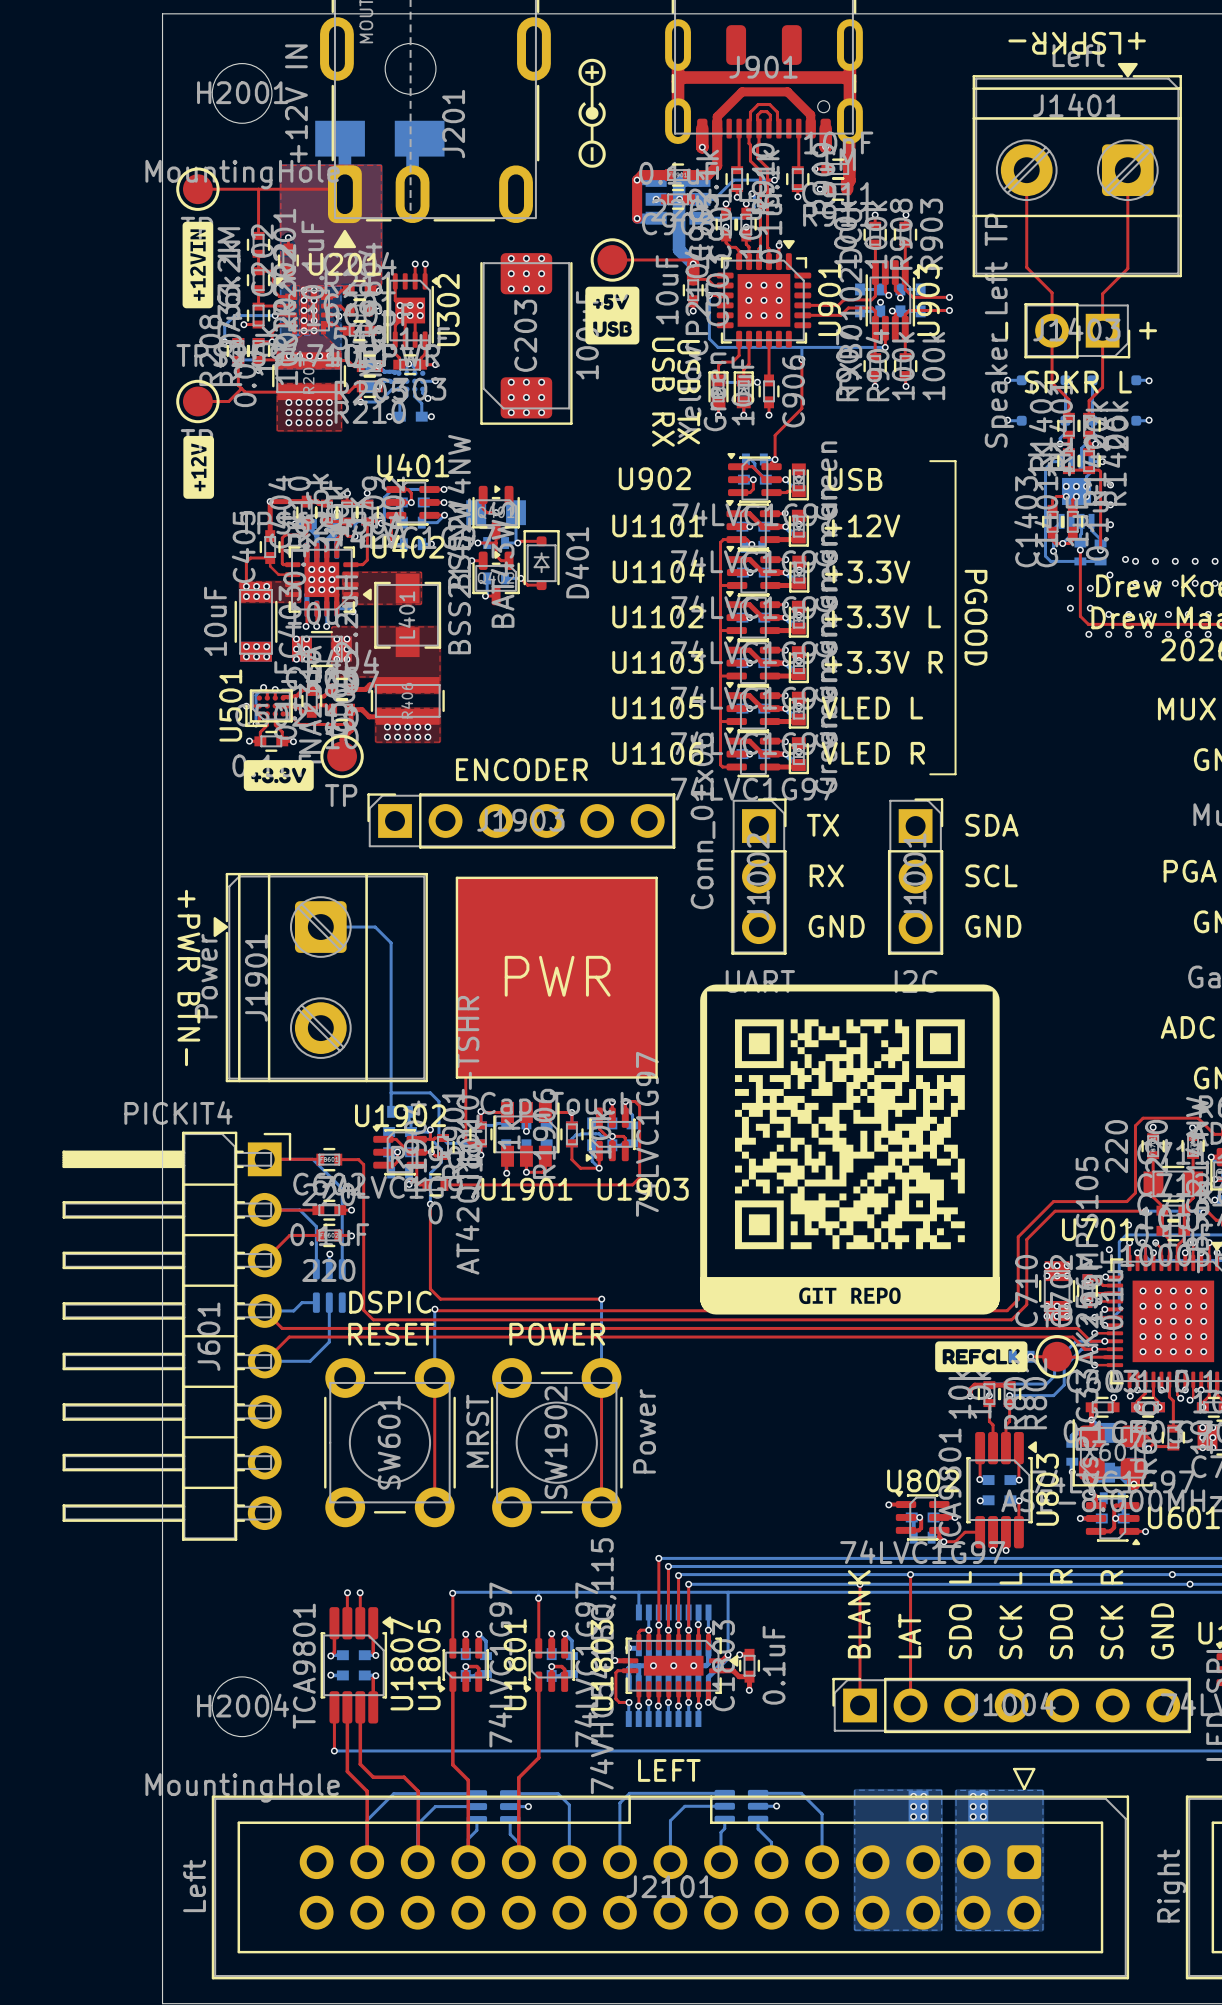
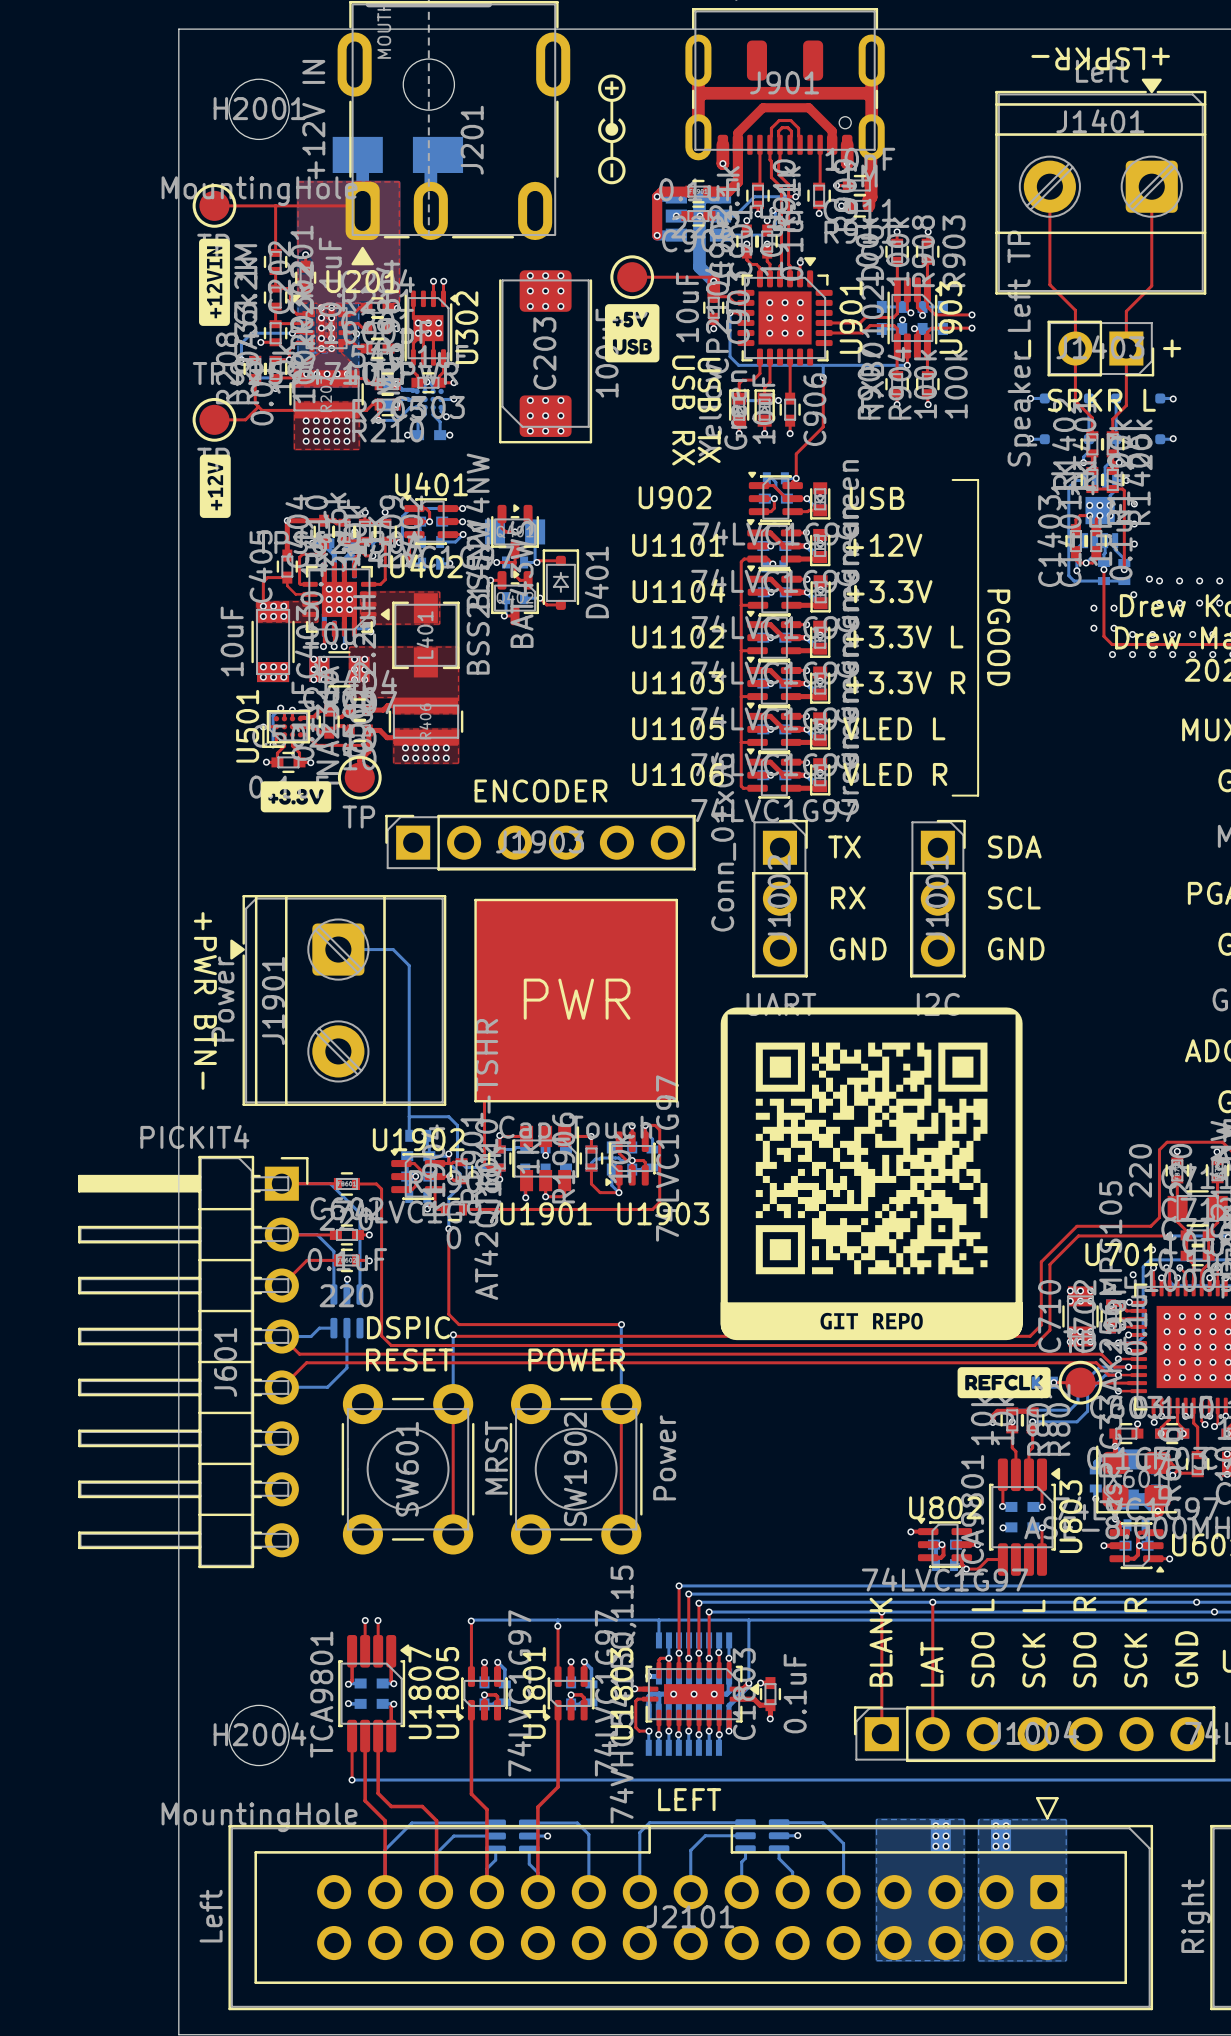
via: (992, 1550) -> none
via: (1006, 1550) -> none

